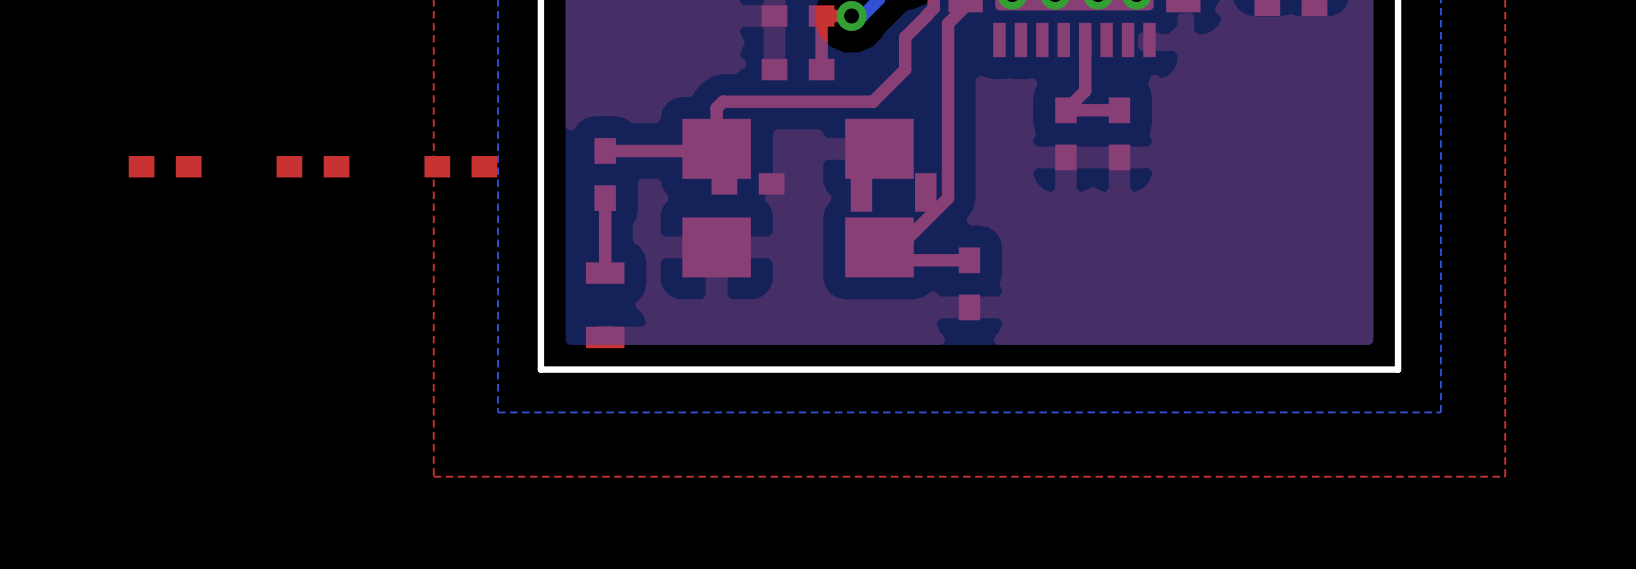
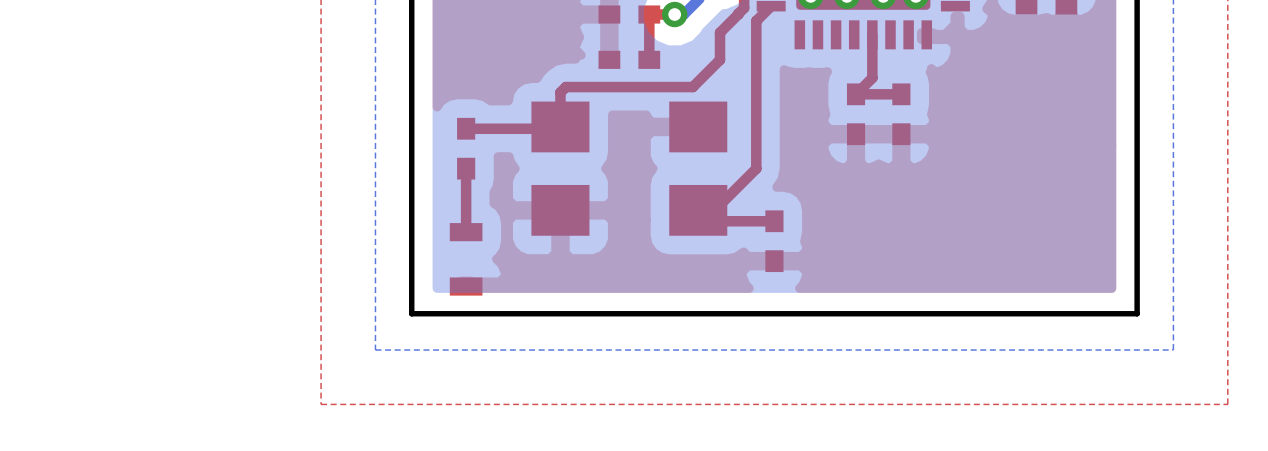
part: (165, 166) -> none
part: (313, 166) -> none
part: (460, 166) -> none
part: (748, 183) -> none
part: (893, 192) -> none

